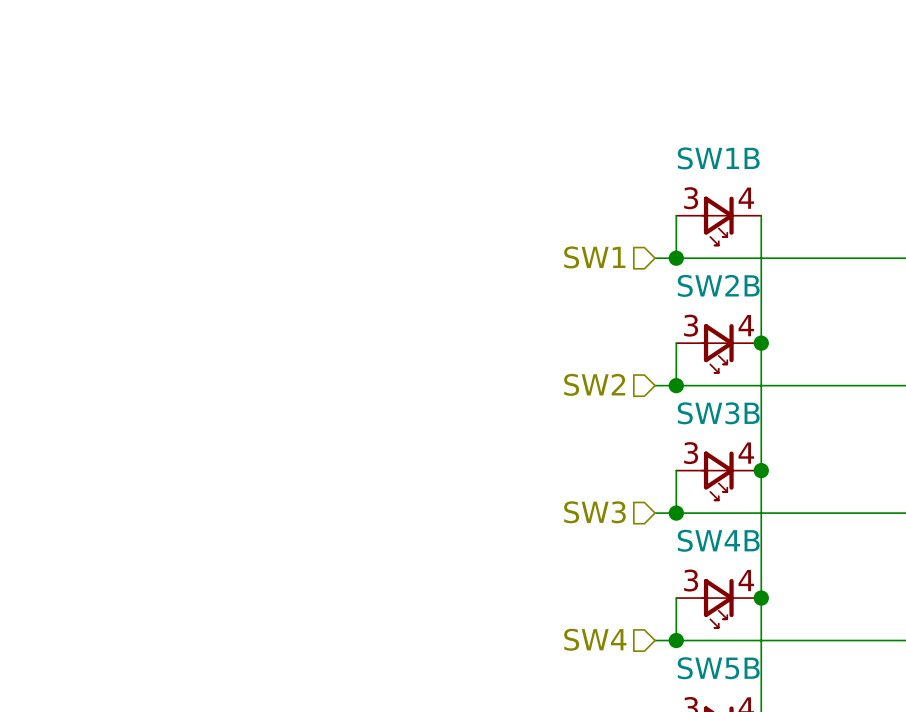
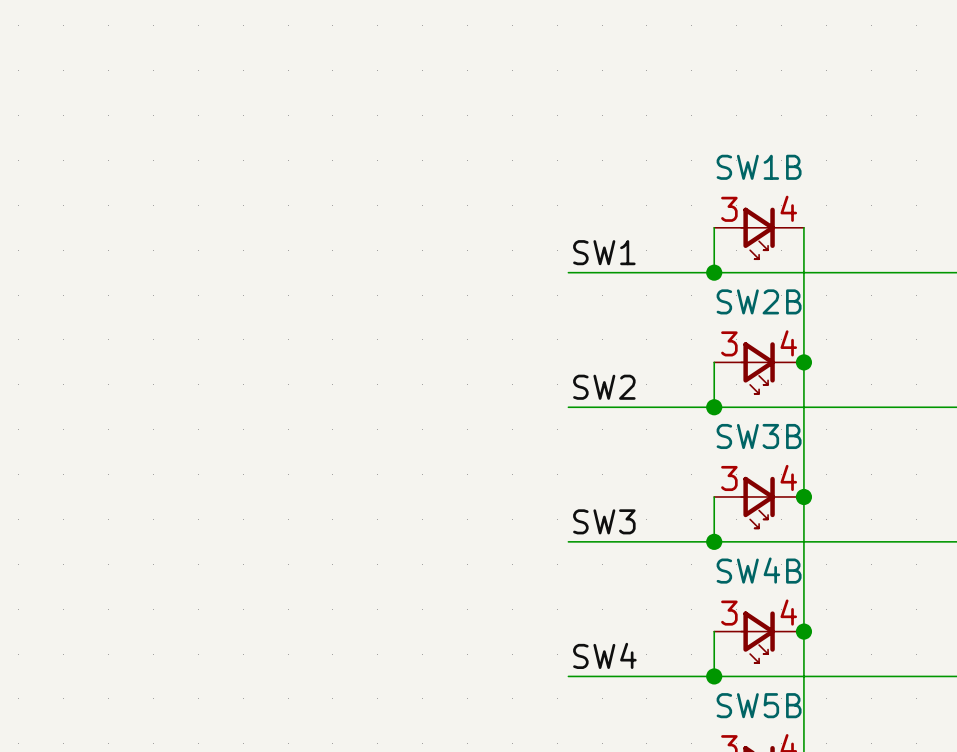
label: none -> SW1 (604, 252)
hierarchical label: SW1 (594, 257) -> none
wire: none -> (568, 272) (691, 272)
label: none -> SW2 (604, 387)
hierarchical label: SW2 (594, 384) -> none
wire: none -> (568, 407) (691, 407)
label: none -> SW3 (604, 521)
hierarchical label: SW3 (594, 512) -> none
wire: none -> (568, 541) (691, 541)
label: none -> SW4 (604, 655)
hierarchical label: SW4 (595, 639) -> none
wire: none -> (568, 676) (691, 676)

